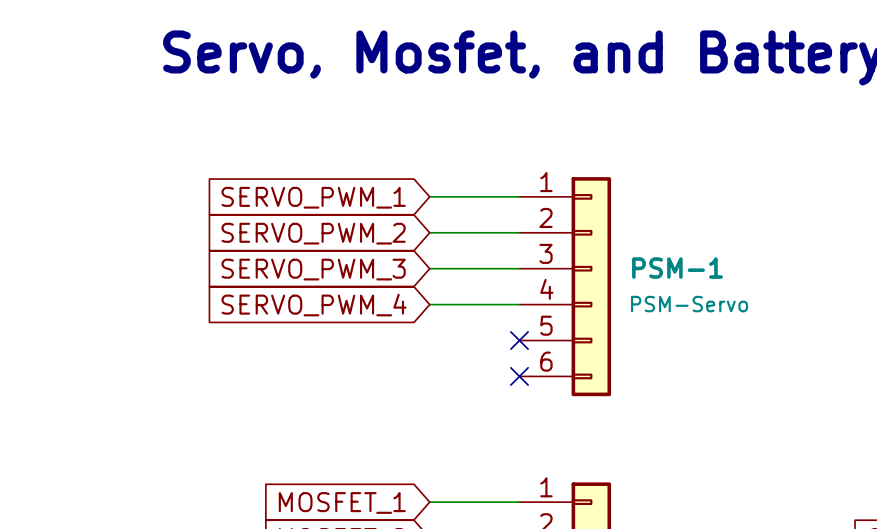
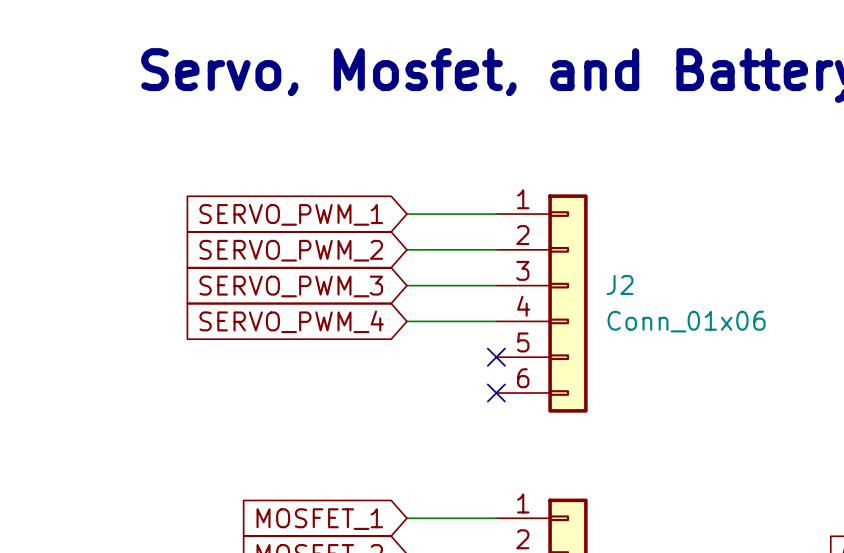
PSM-1 name: PSM-1 (677, 268) -> J2 (620, 284)
PSM-1 value: PSM-Servo (689, 304) -> Conn_01x06 (686, 321)

